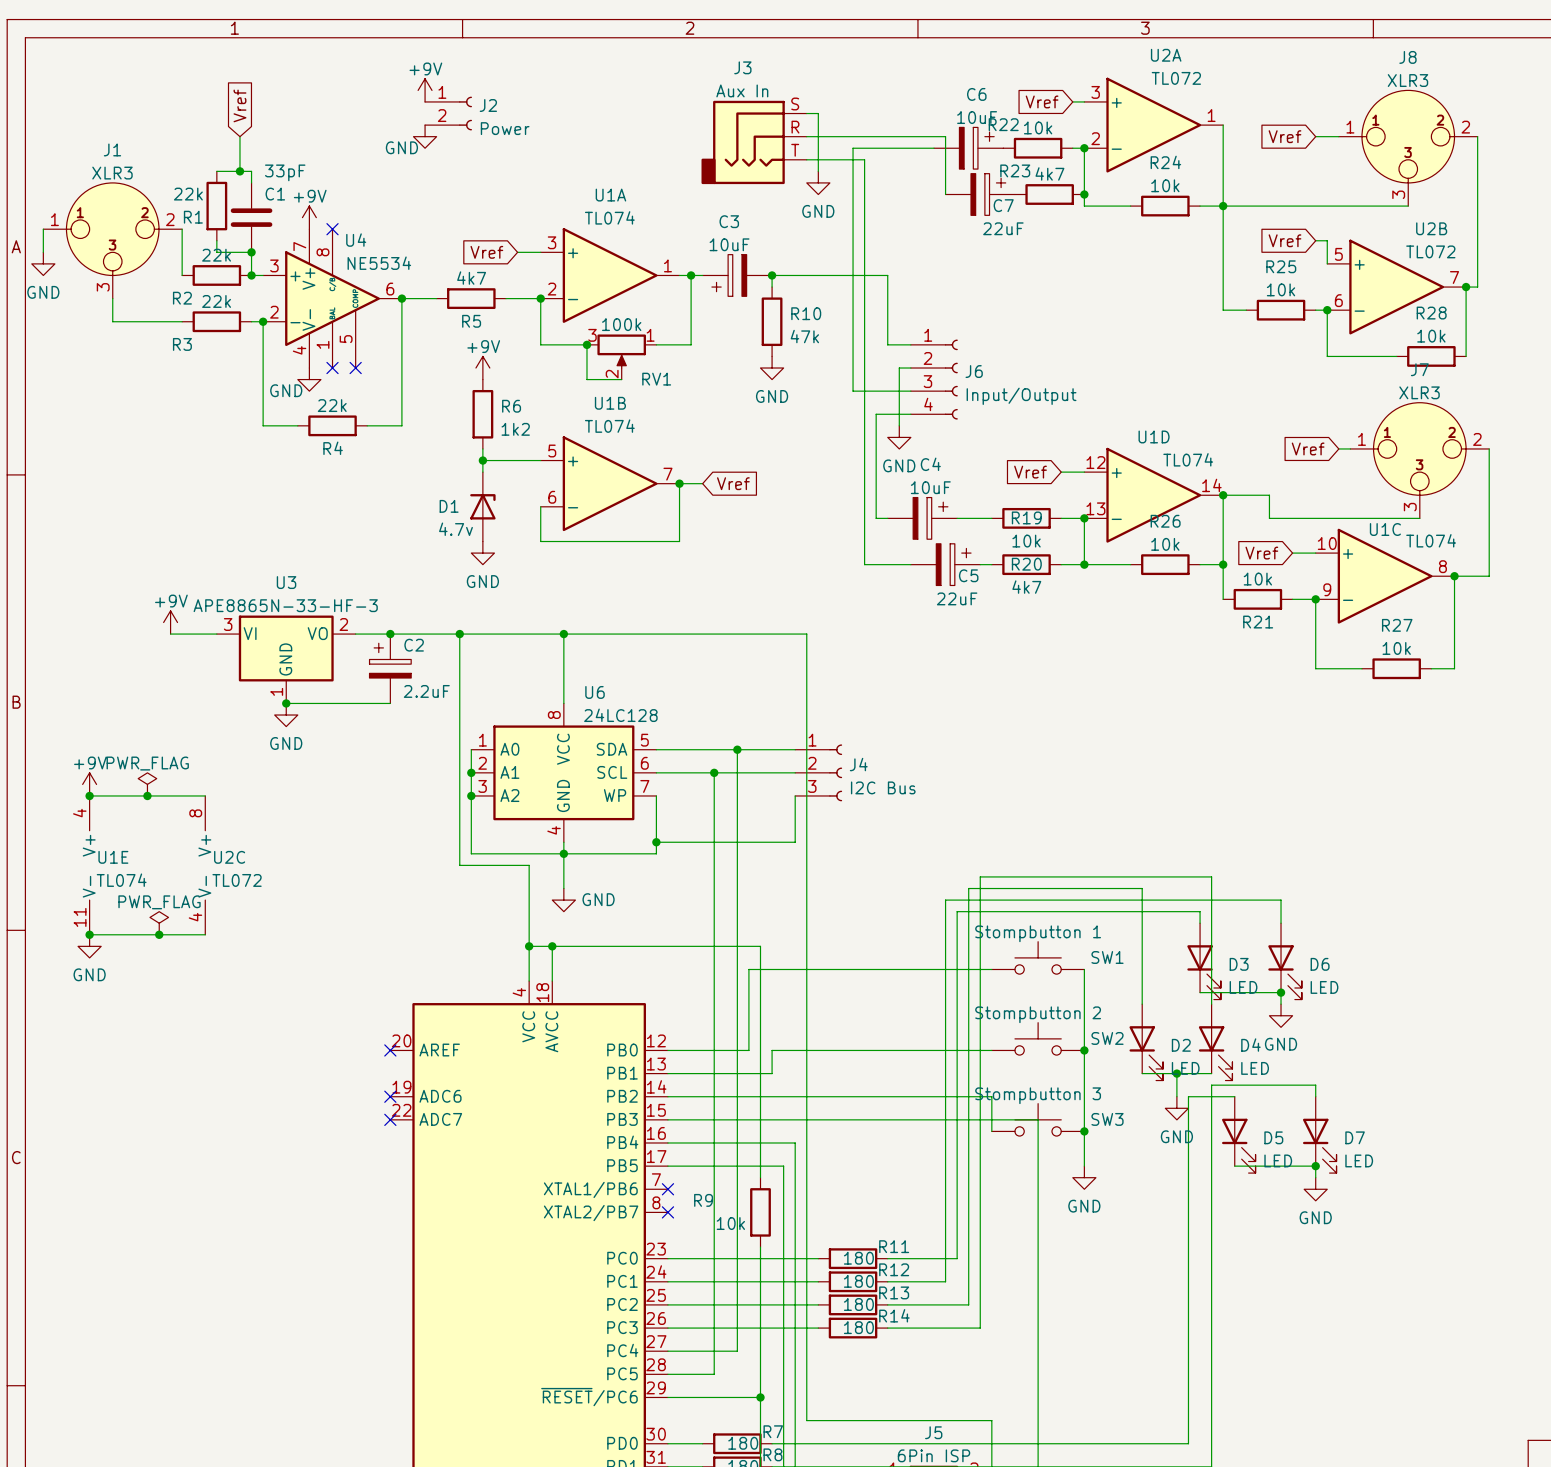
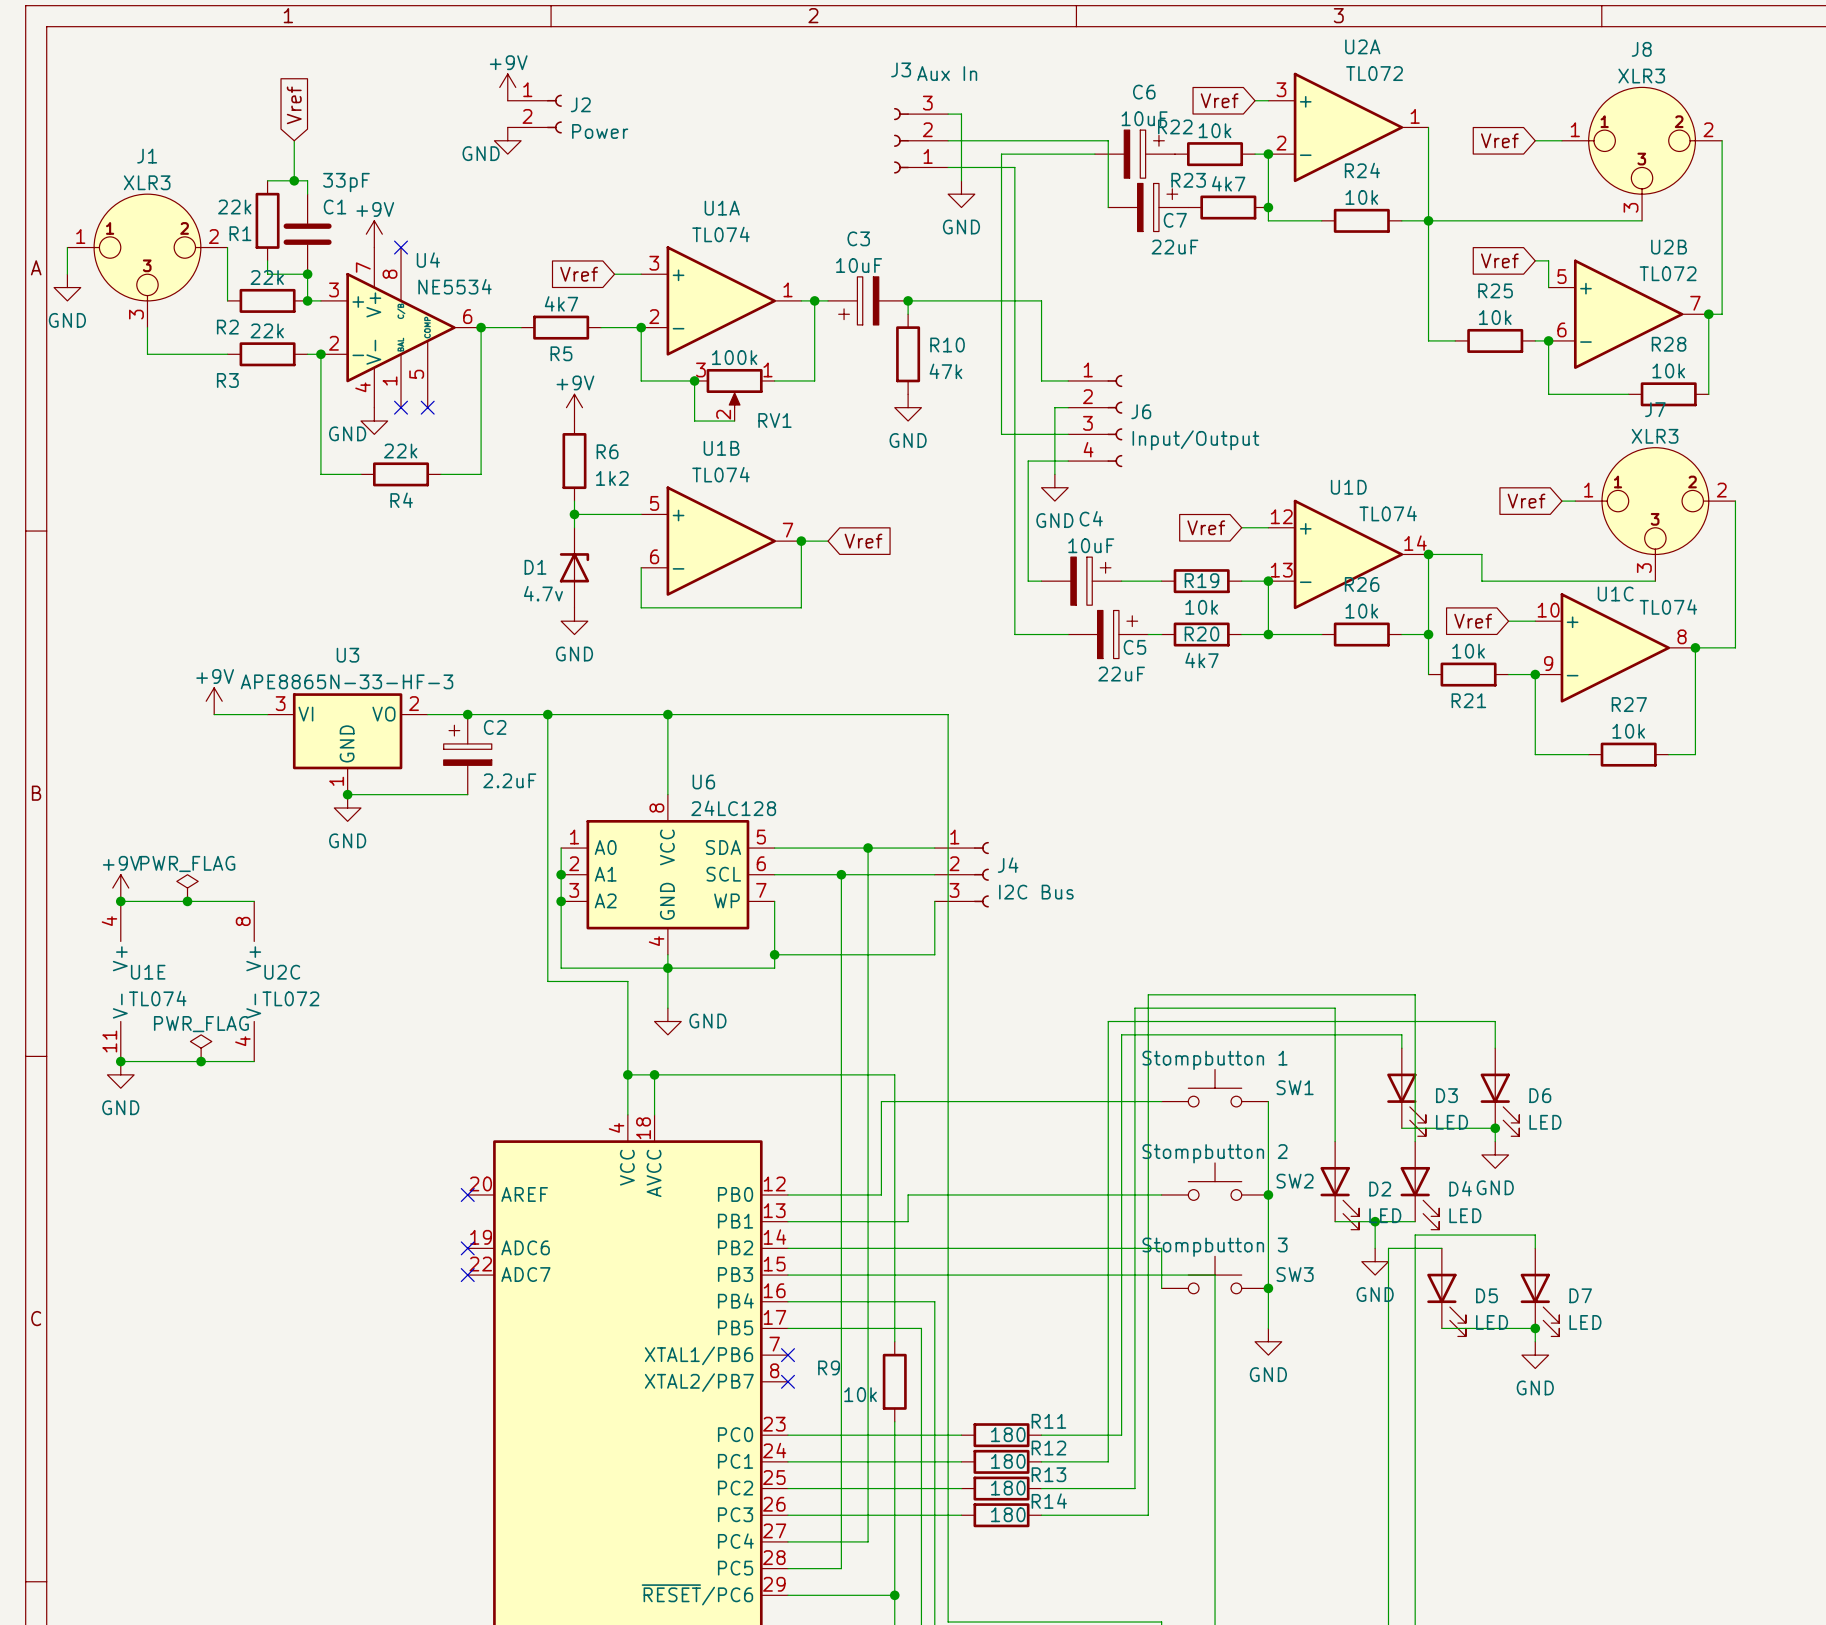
J3 value position: Aux In (742, 90) -> Aux In (947, 73)
J3 symbol: [701, 100, 807, 185] -> [893, 107, 949, 174]

